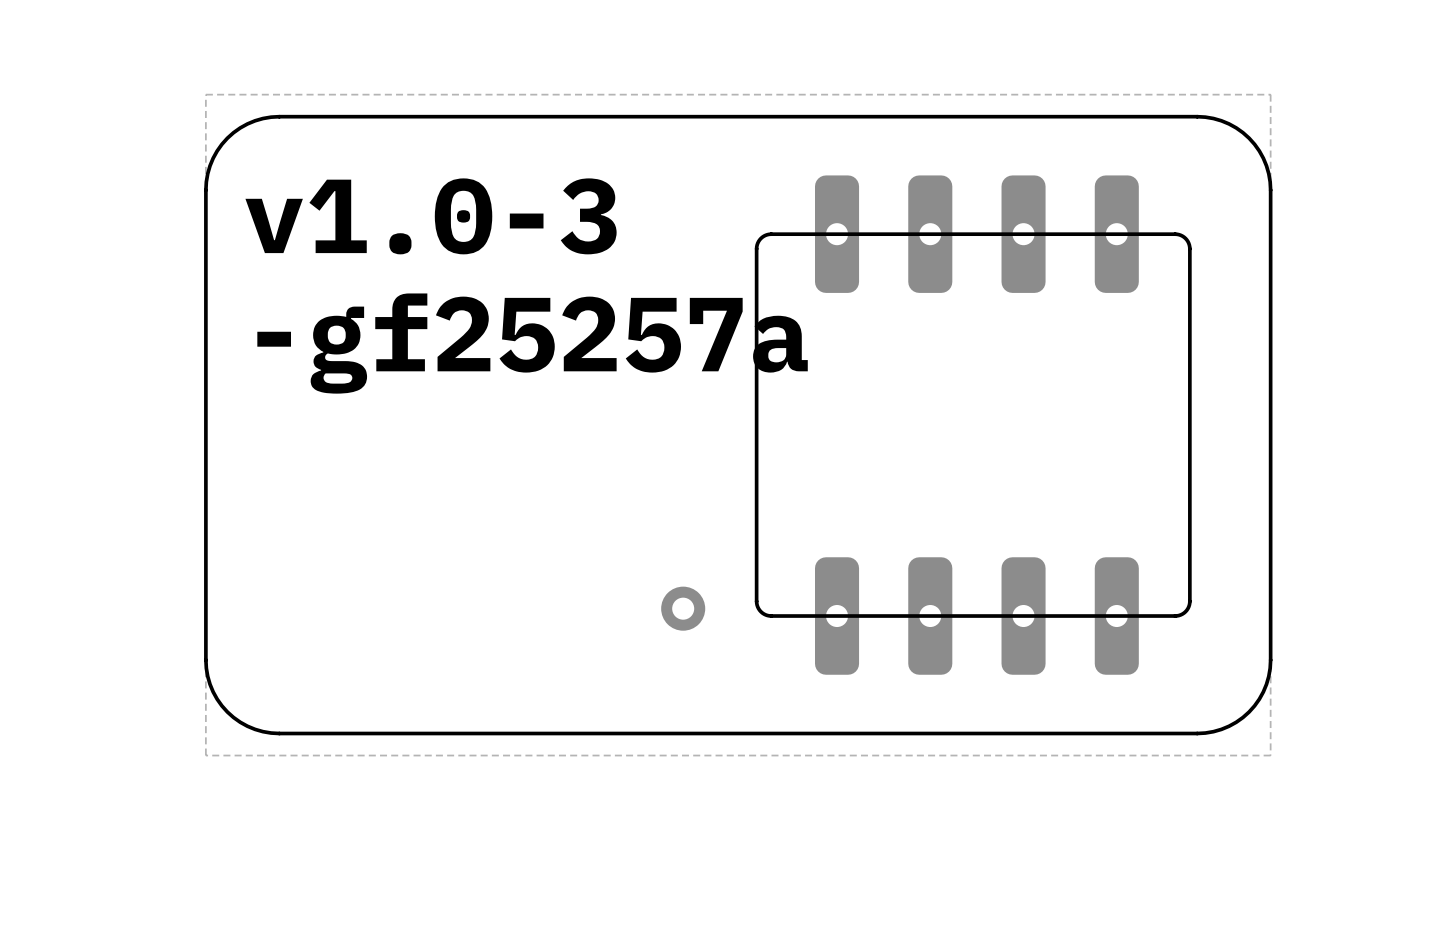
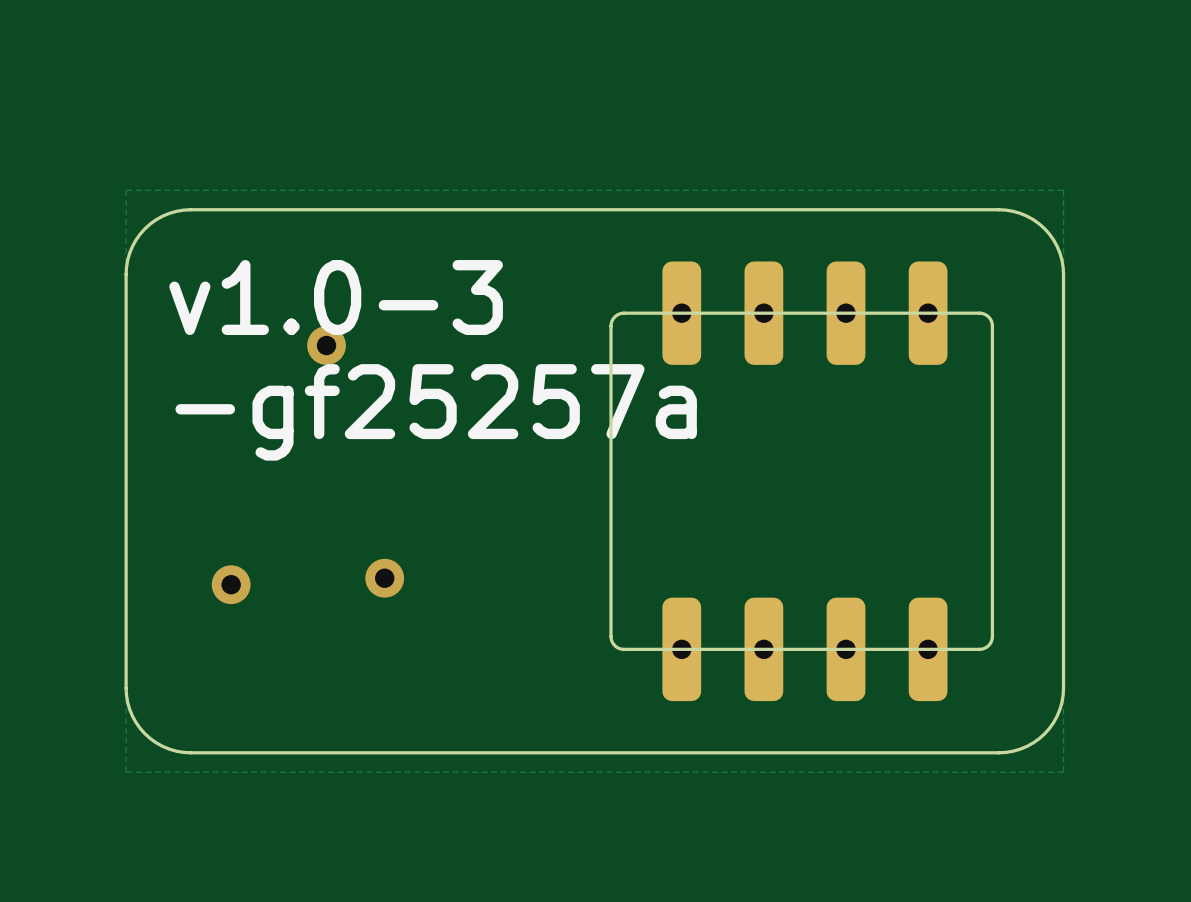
via: none -> (326, 345)
via: none -> (384, 578)
via: none -> (231, 584)
via: (683, 608) -> none

